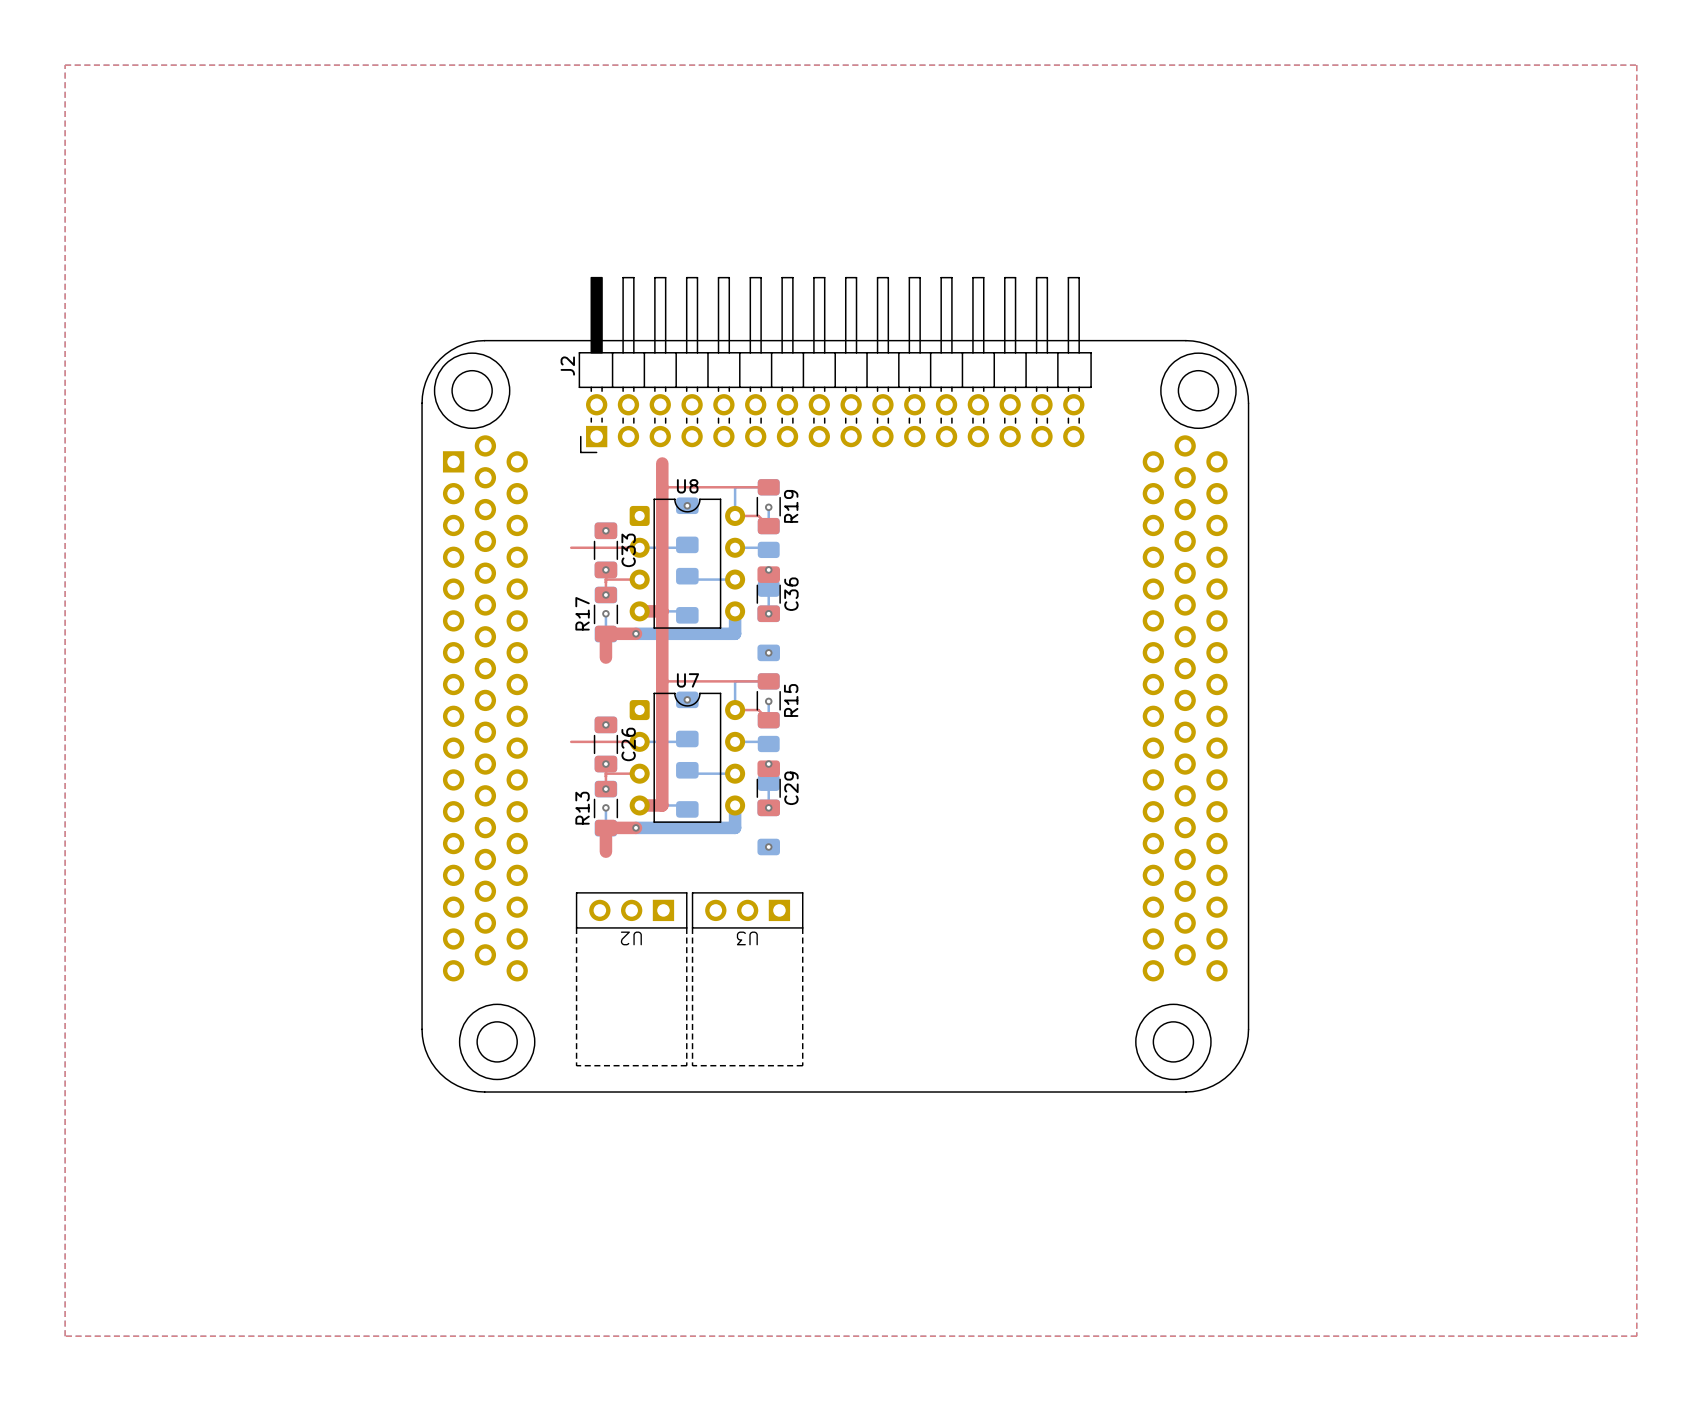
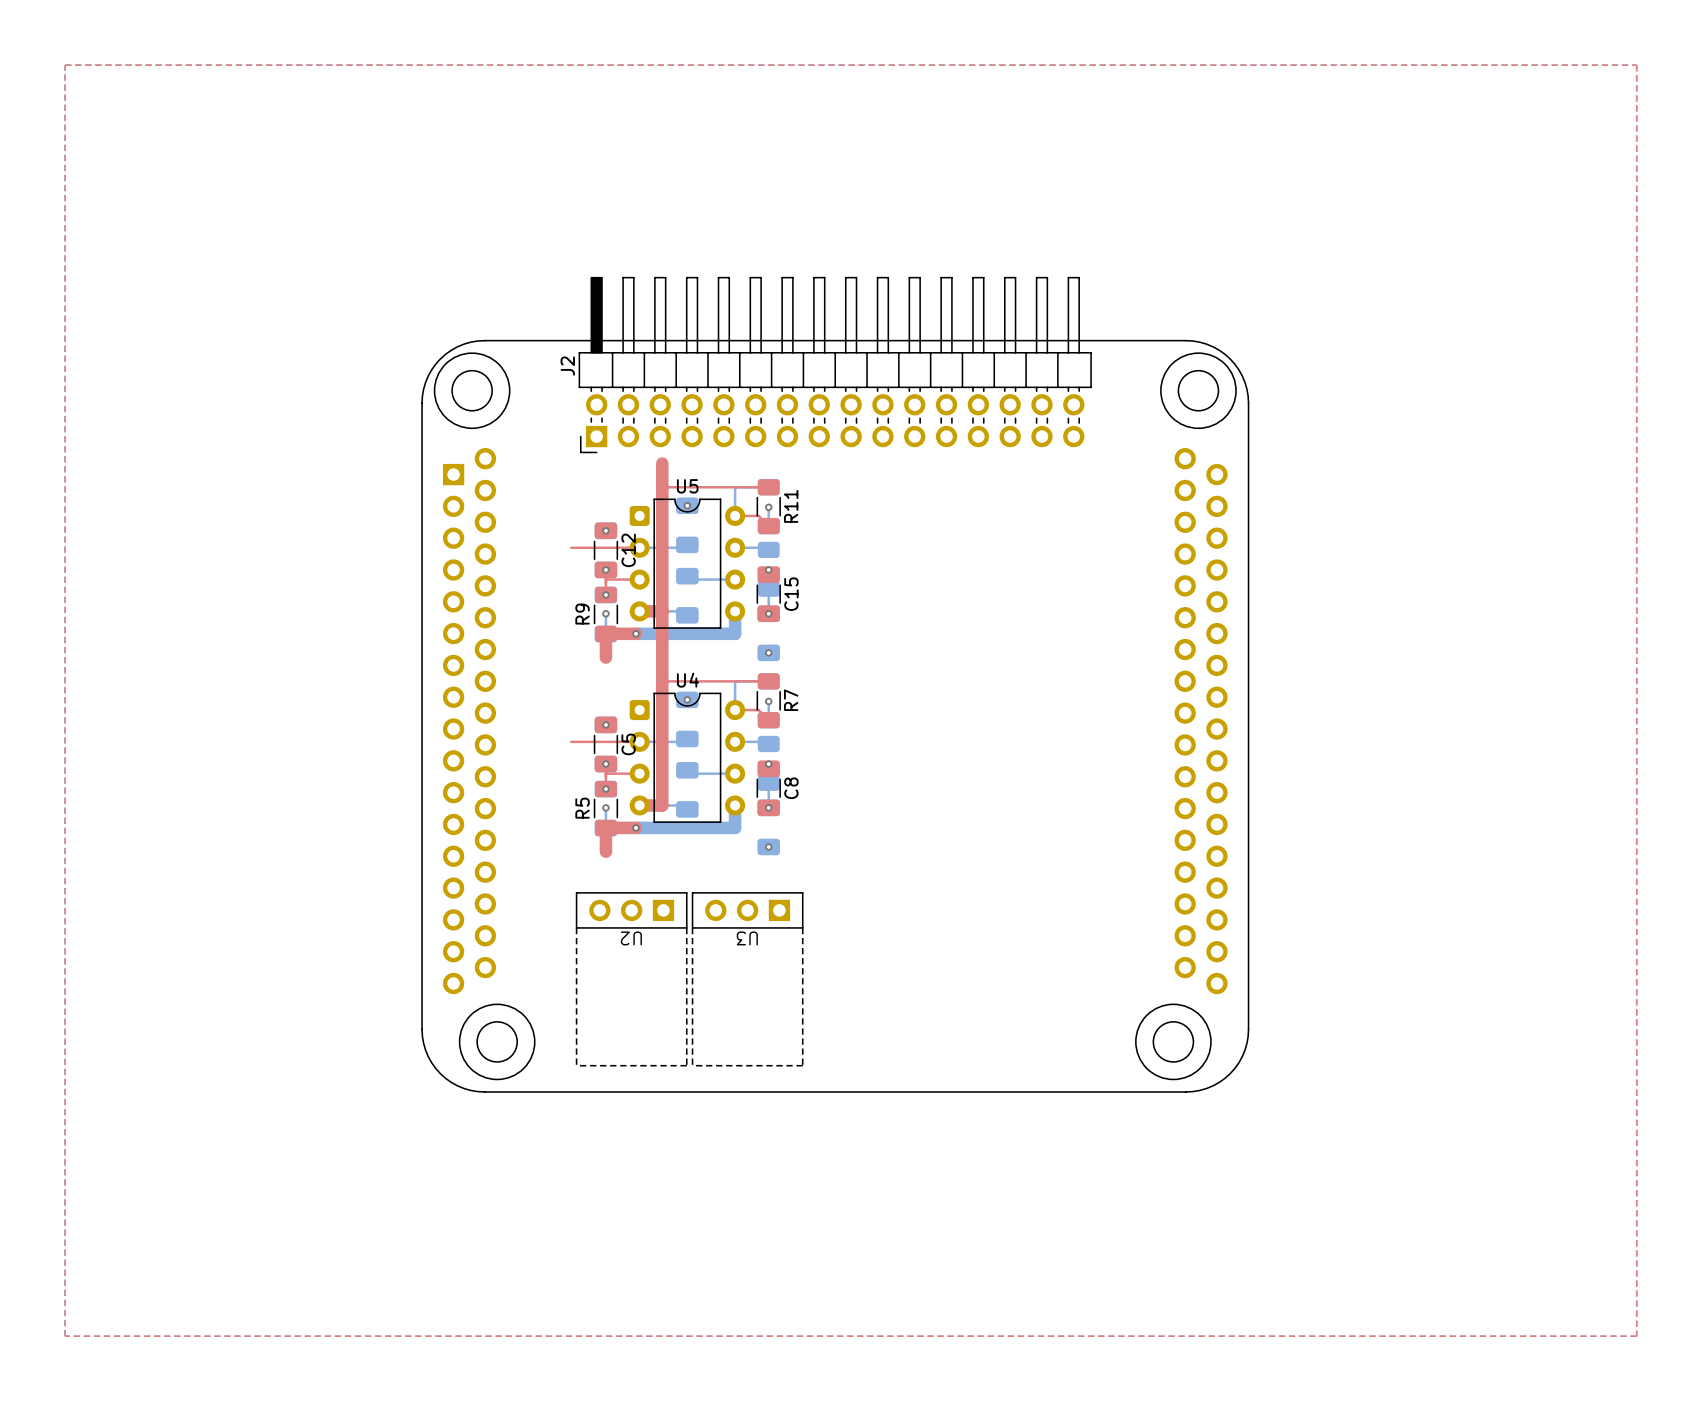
part footprint: [421, 340, 1249, 1093] -> [421, 340, 1249, 1093]
U8 name: U8 (687, 486) -> U5 (687, 486)
R19 name: R19 (791, 506) -> R11 (791, 506)
C33 name: C33 (628, 550) -> C12 (628, 550)
C36 name: C36 (791, 594) -> C15 (791, 594)
R17 name: R17 (582, 613) -> R9 (582, 614)
U7 name: U7 (687, 680) -> U4 (687, 680)
R15 name: R15 (791, 700) -> R7 (791, 700)
C26 name: C26 (628, 744) -> C5 (628, 744)
C29 name: C29 (791, 788) -> C8 (791, 788)
R13 name: R13 (582, 808) -> R5 (582, 808)

